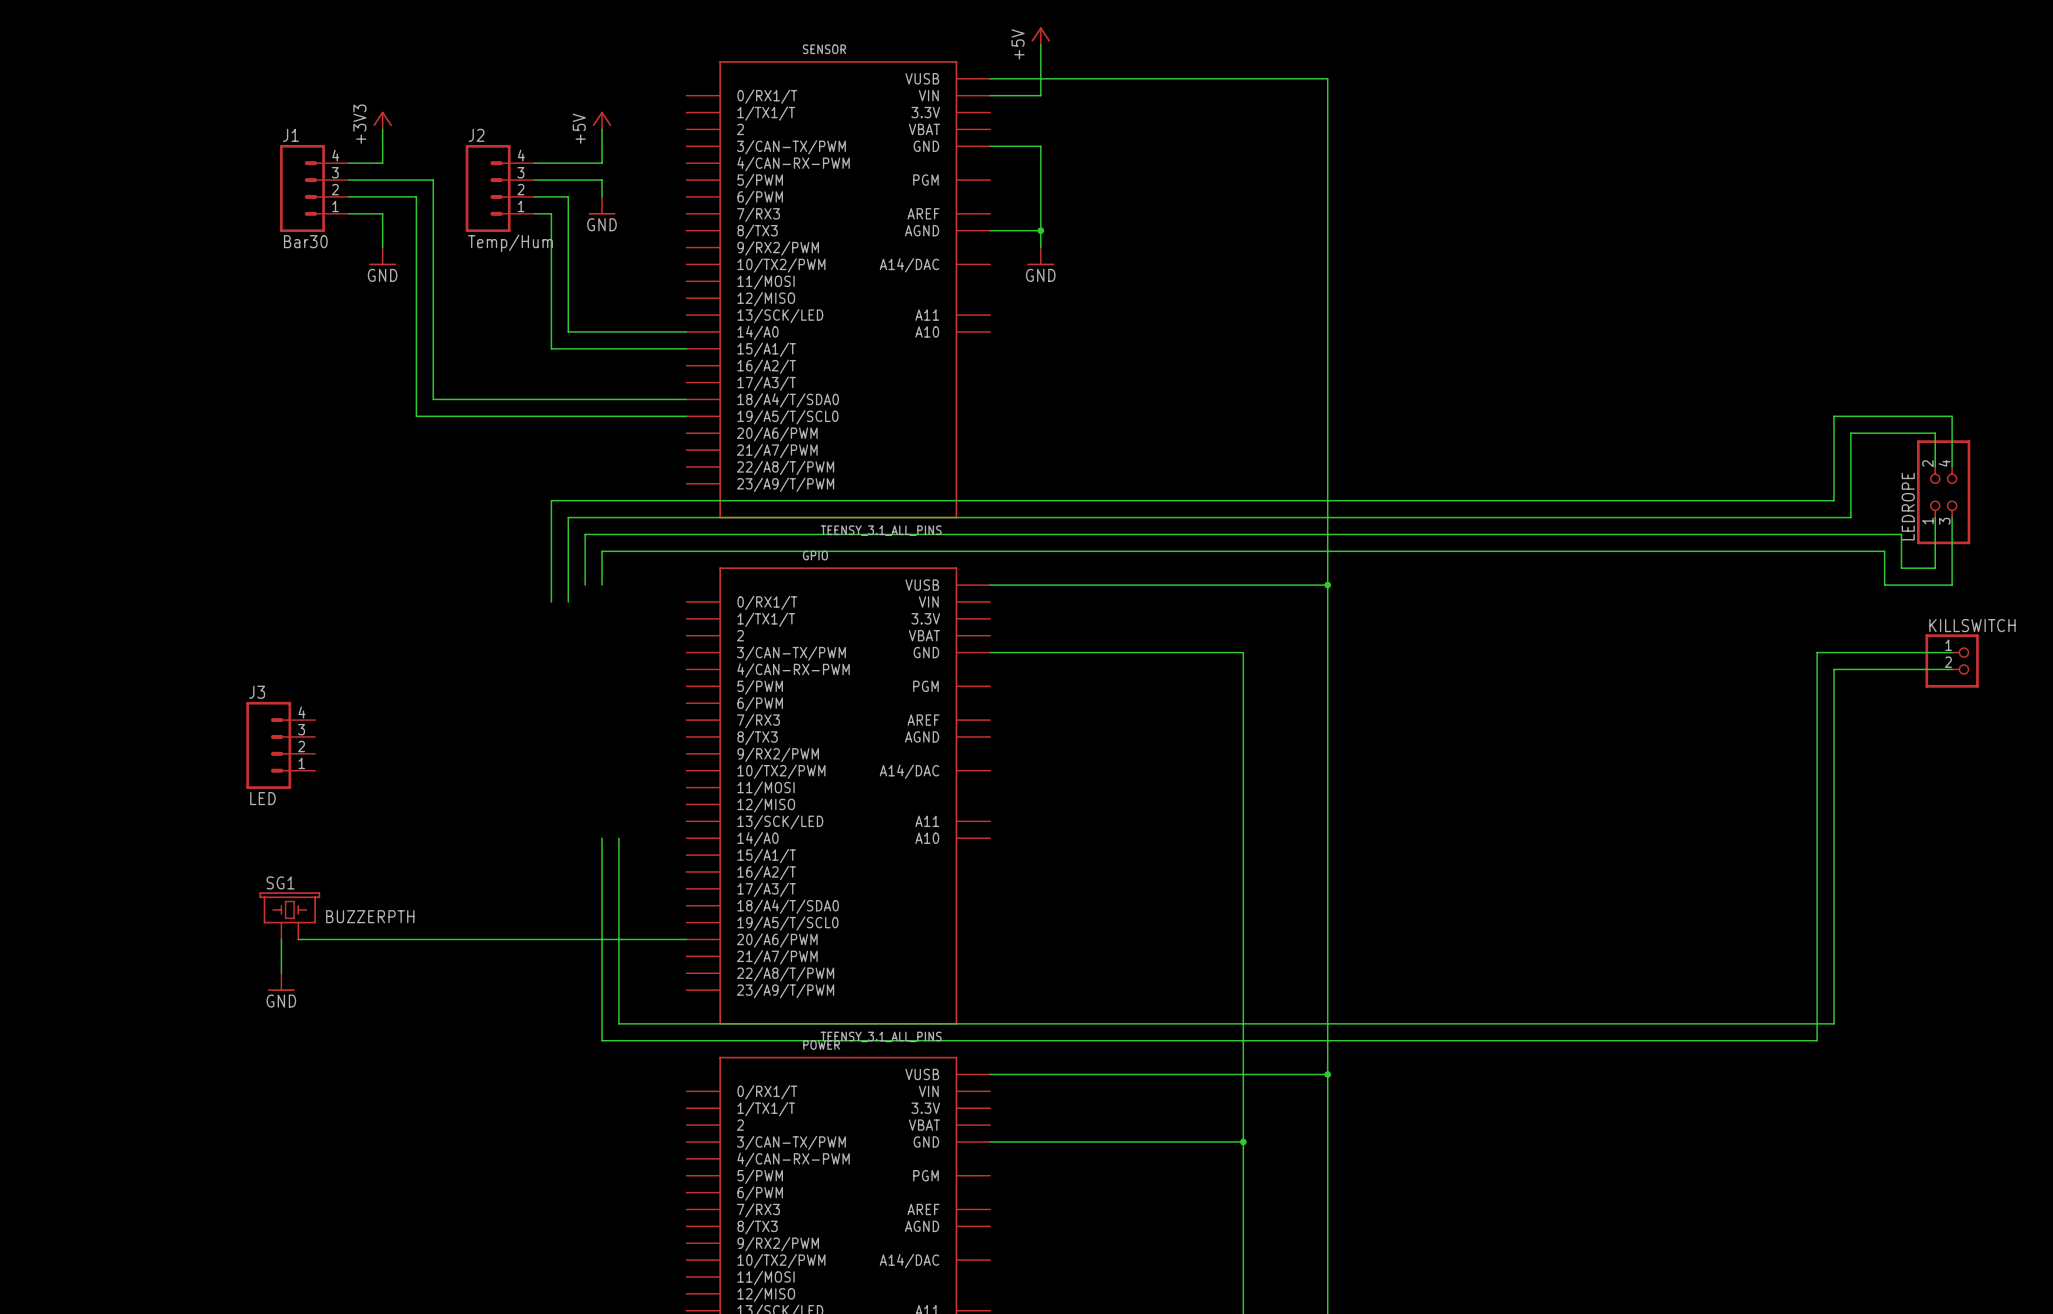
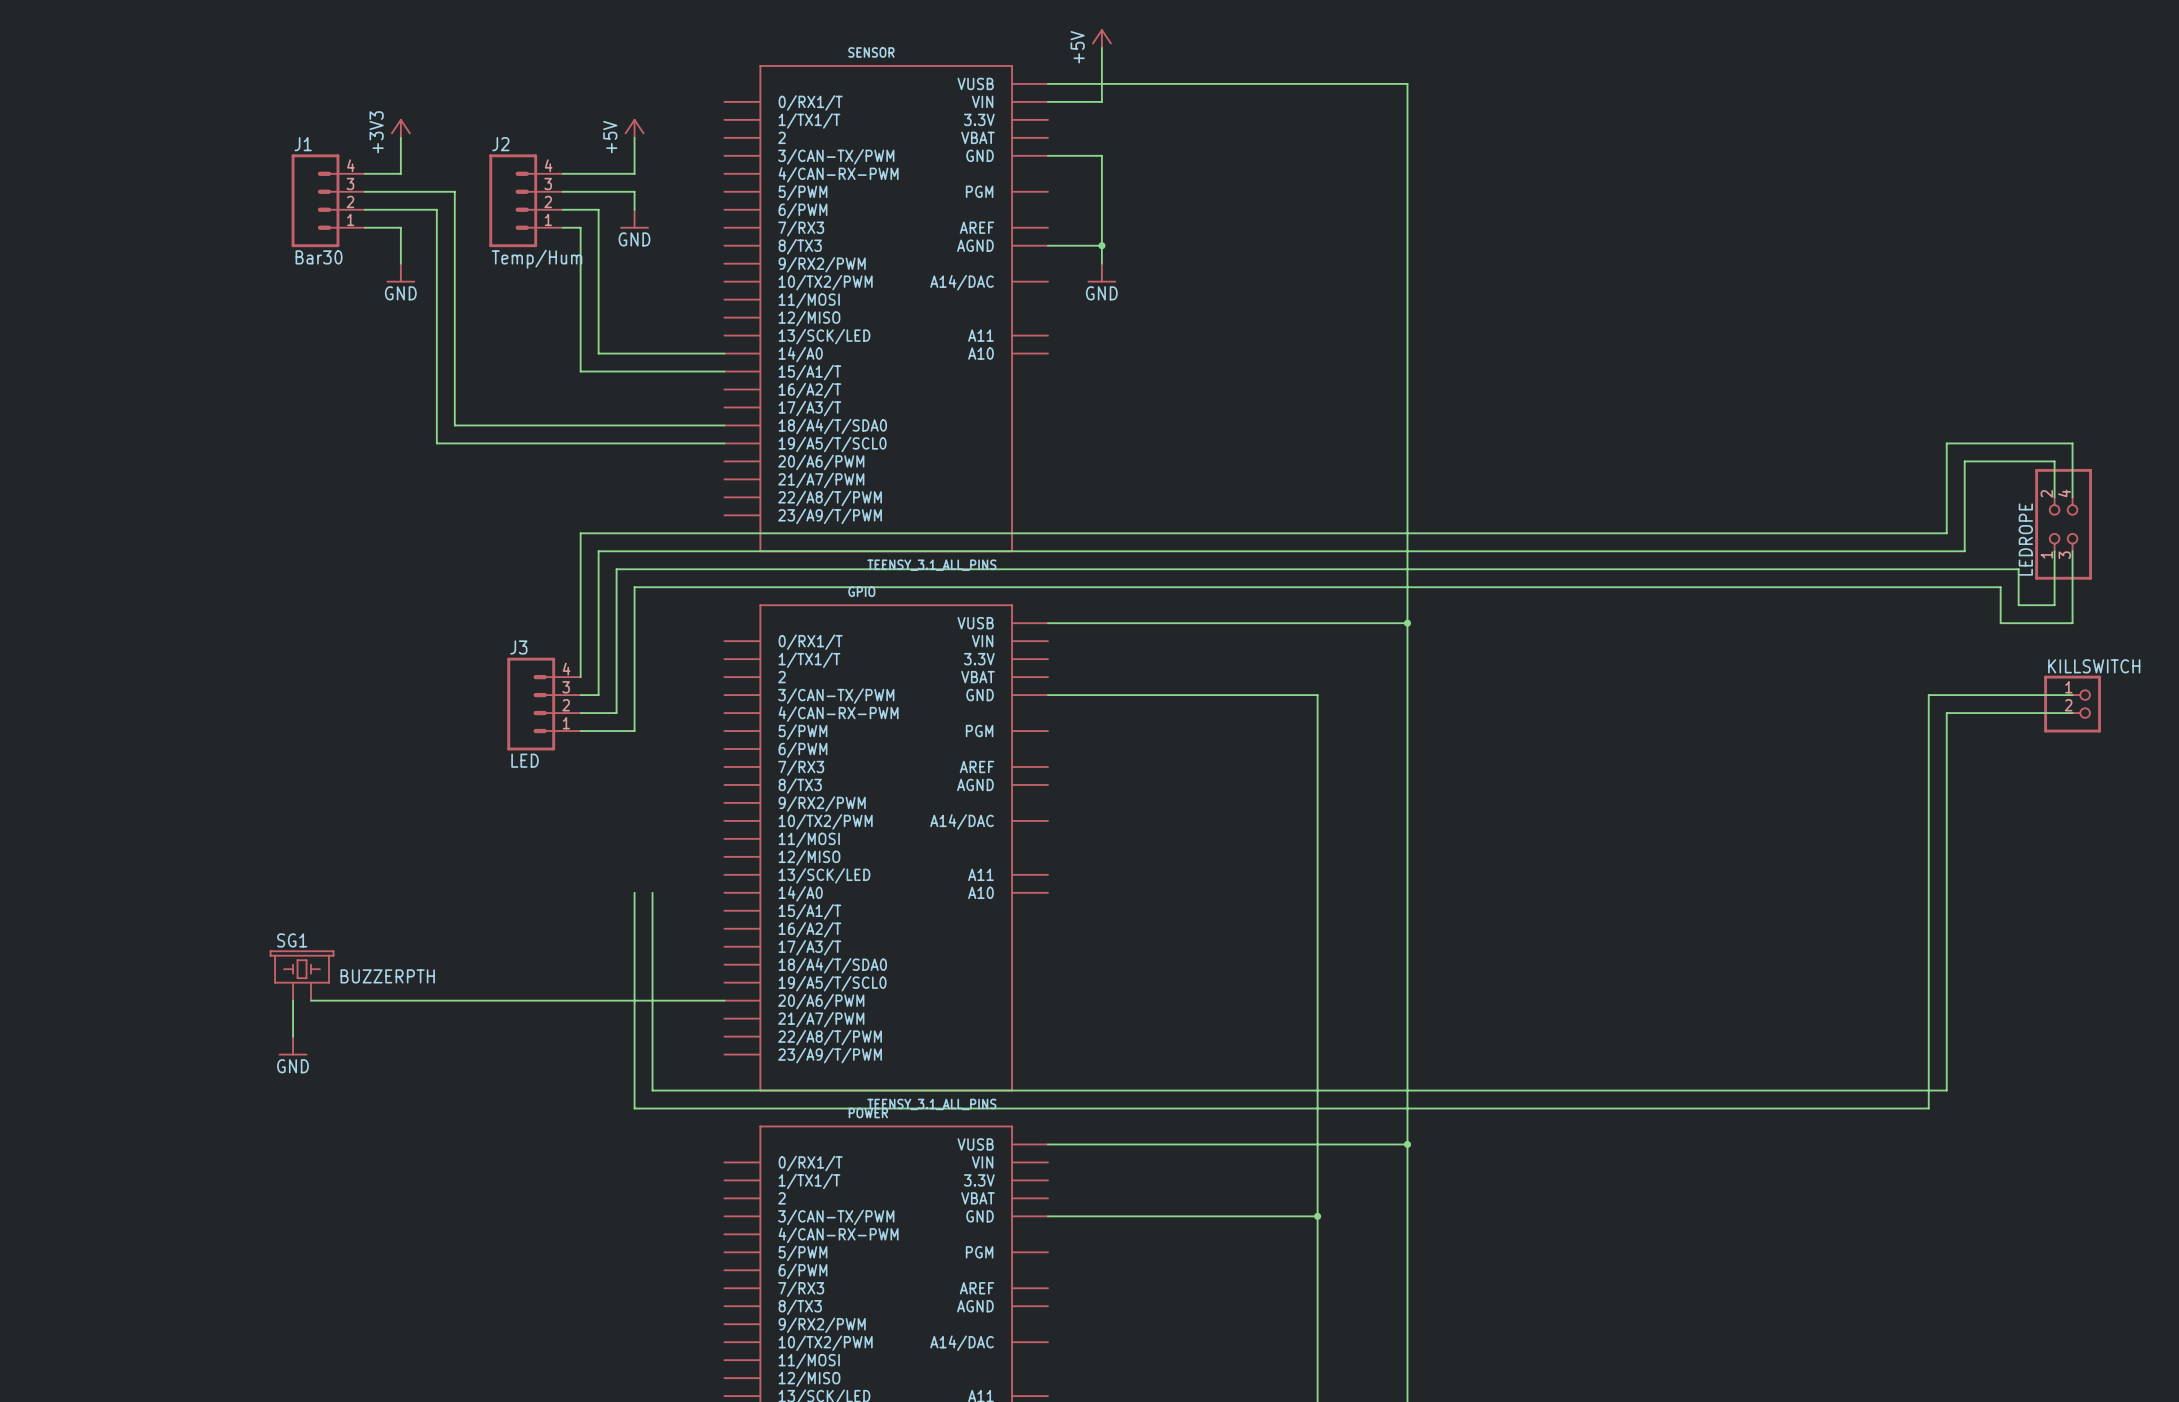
wire: none -> (616, 623) (616, 713) (580, 713)
wire: none -> (634, 623) (634, 731) (580, 731)
wire: none -> (580, 641) (580, 677)
wire: none -> (598, 641) (598, 695) (580, 695)
J3 position: (280, 745) -> (543, 704)

